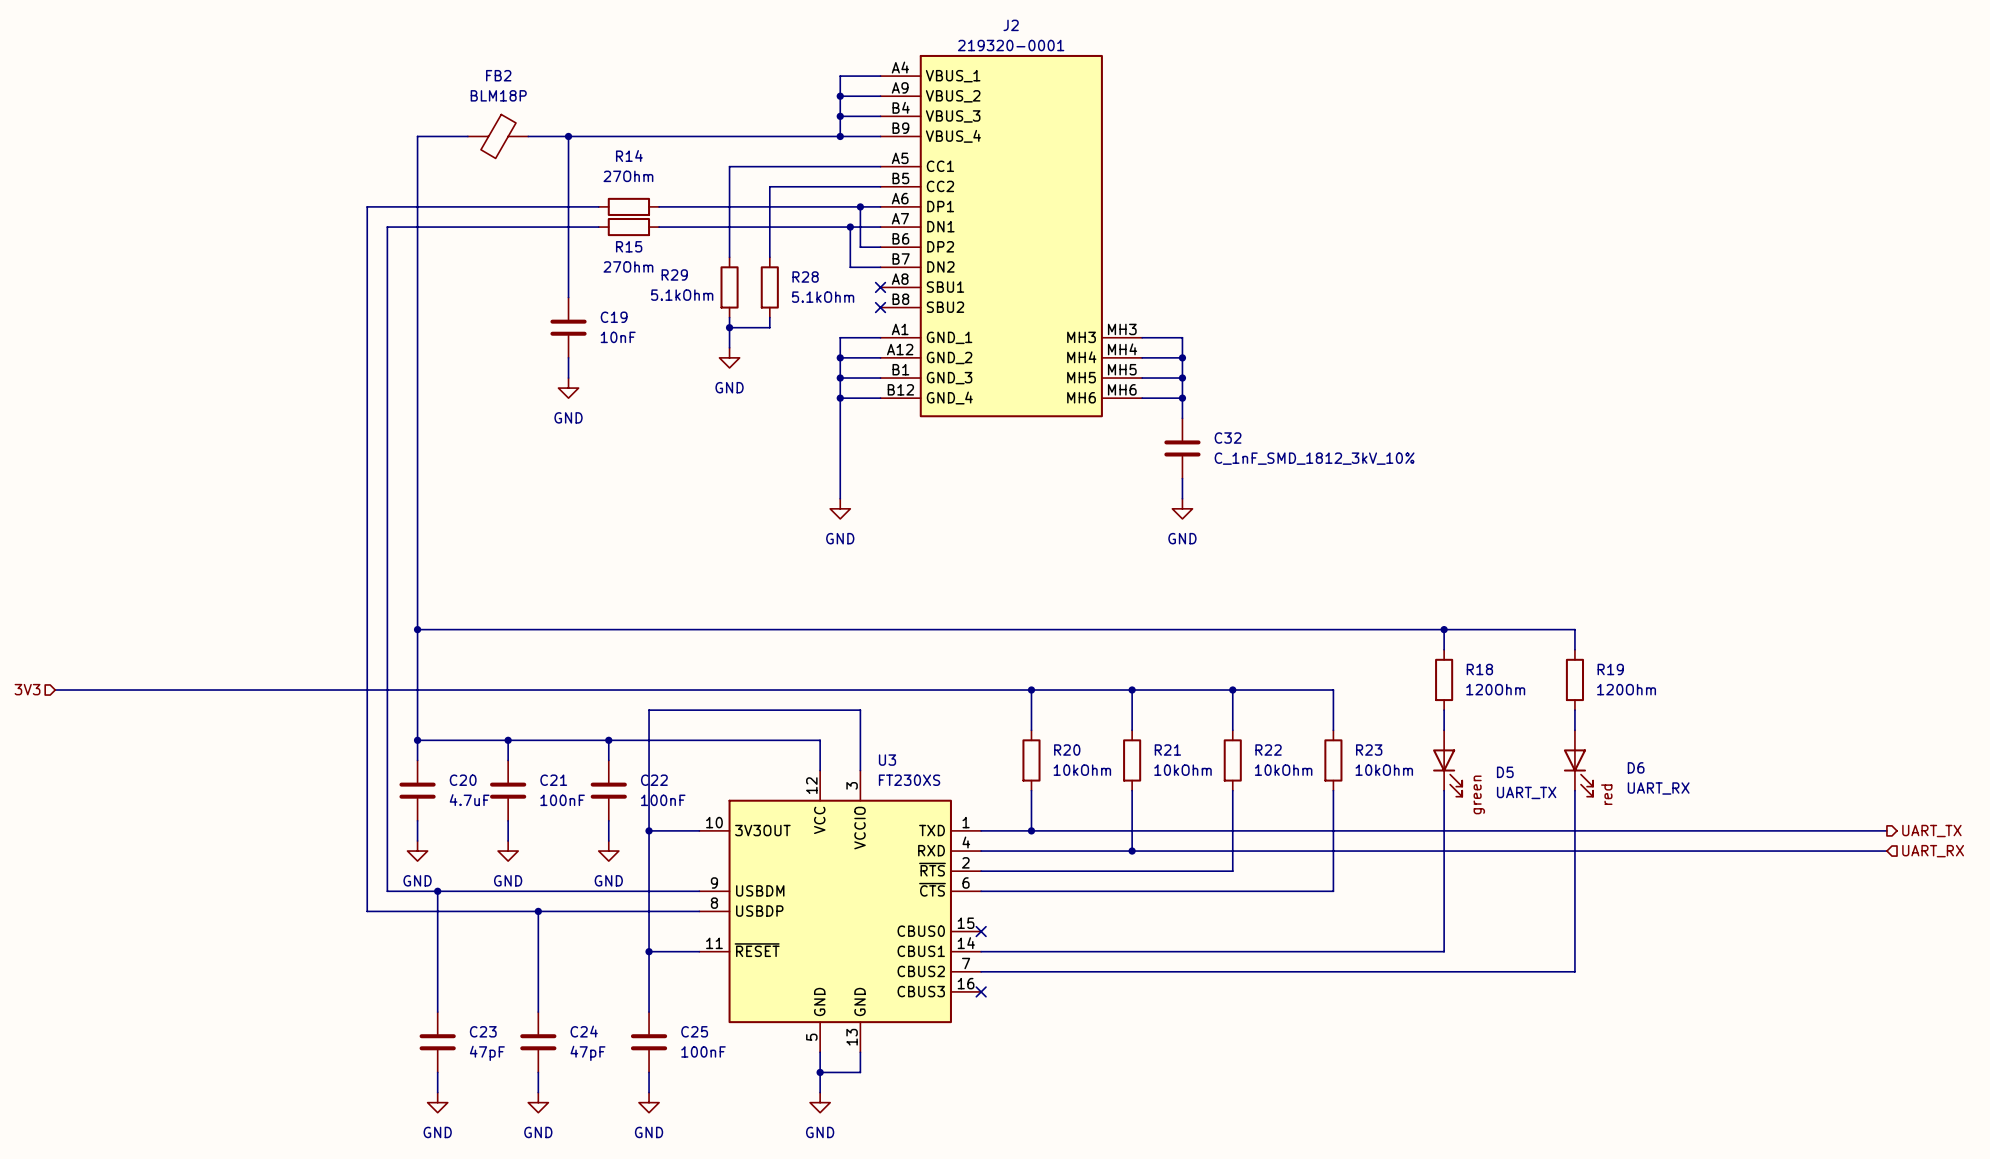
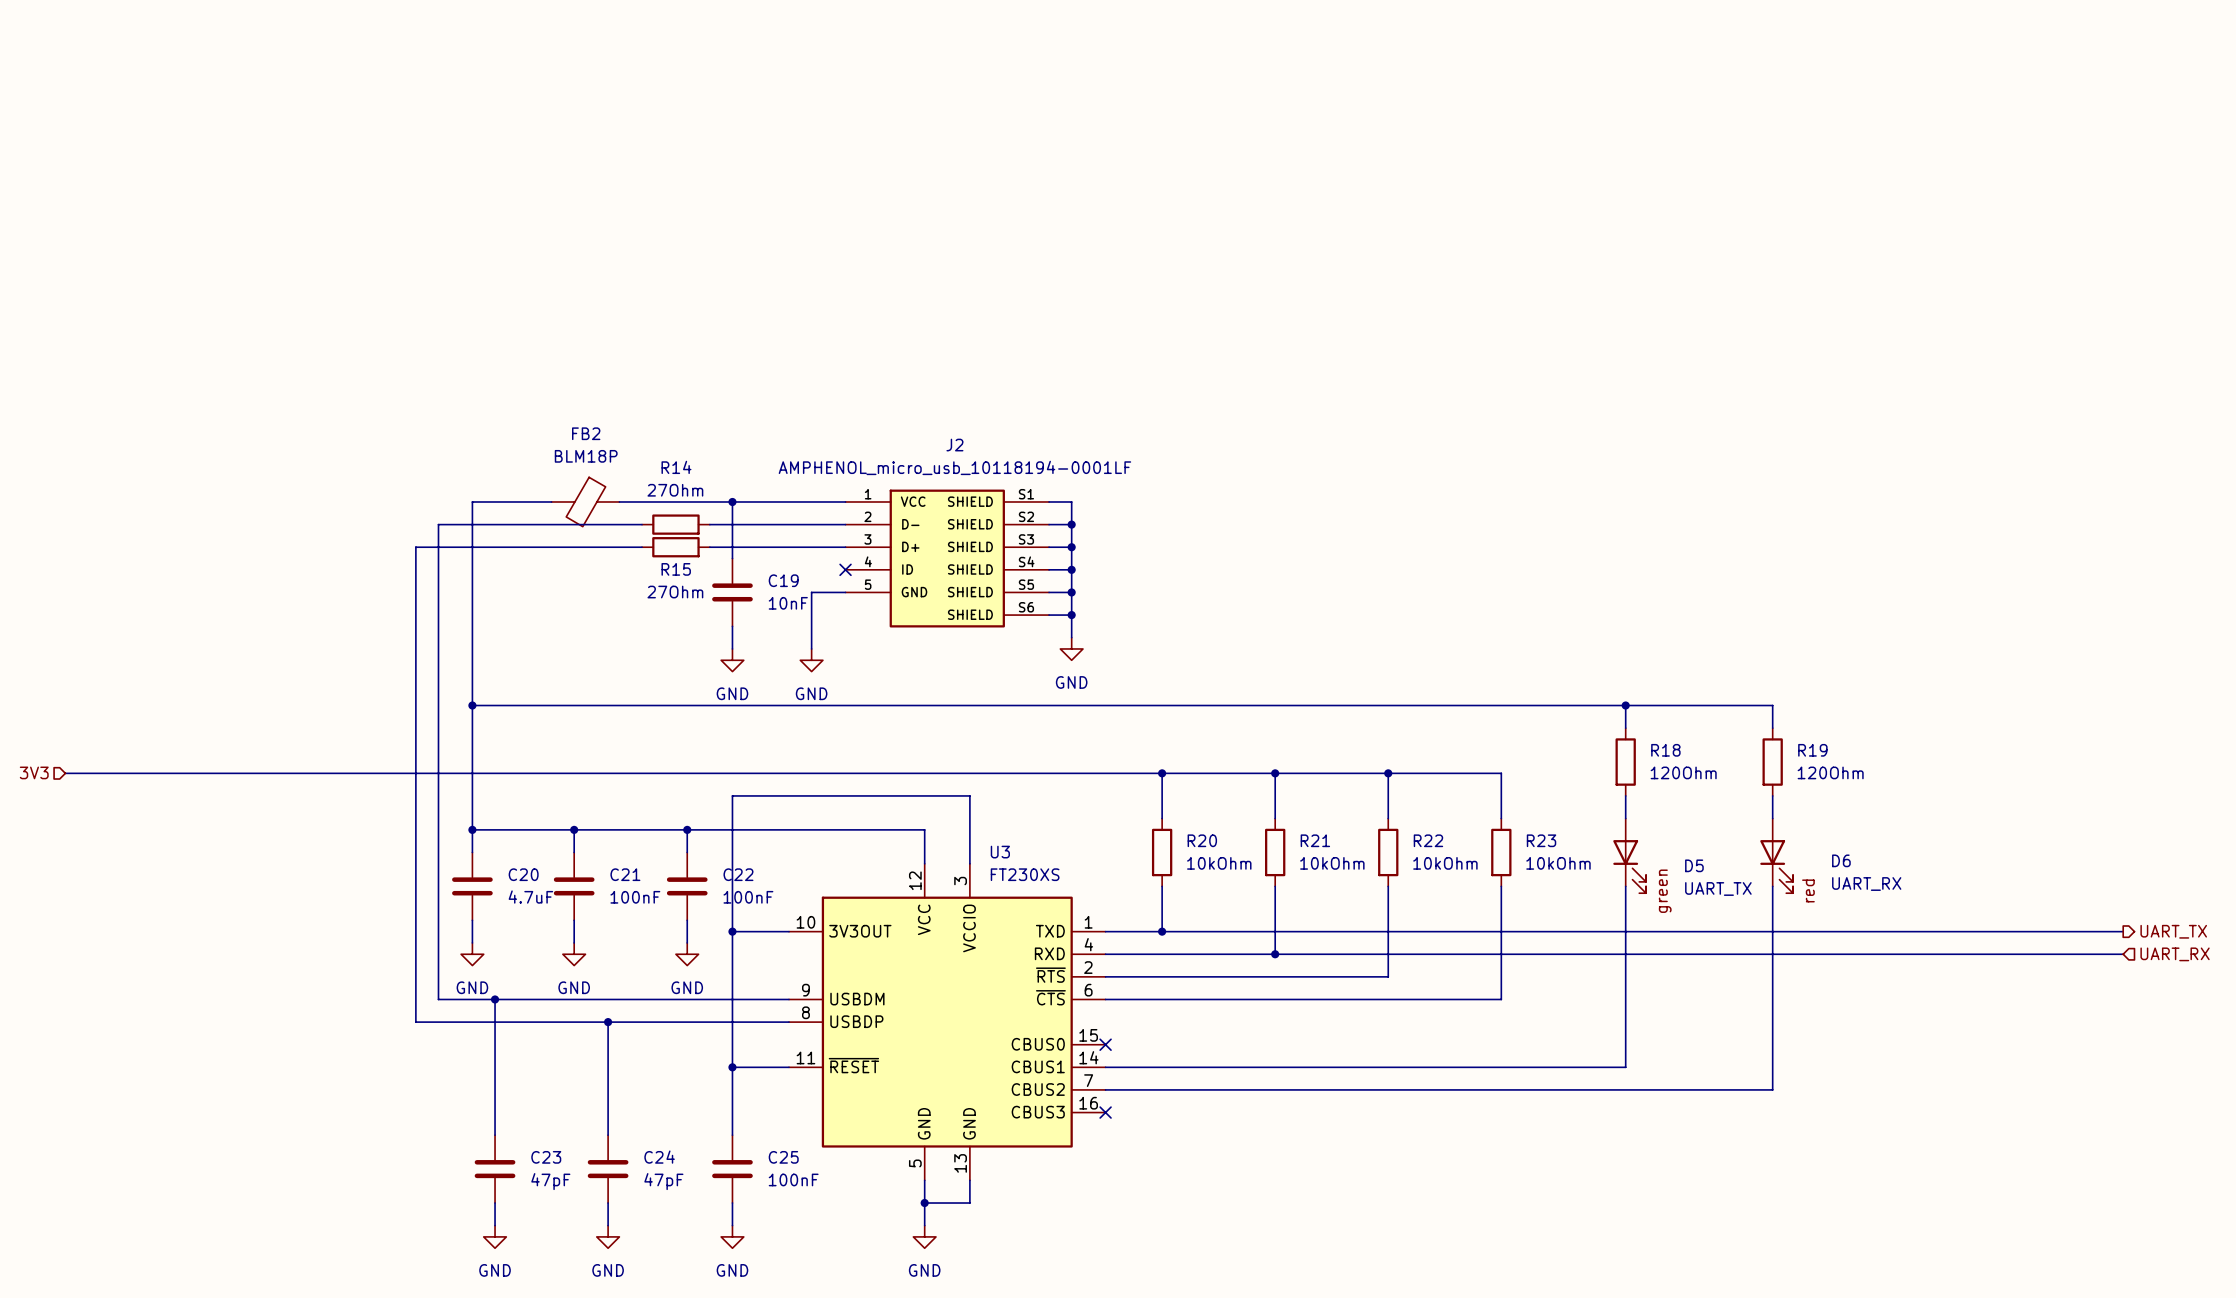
J2 name position: J2 (1011, 25) -> J2 (954, 445)
J2 value: 219320-0001 (1011, 45) -> AMPHENOL_micro_usb_10118194-0001LF (954, 467)
J2 symbol: [880, 54, 1143, 418] -> [845, 489, 1050, 628]
wire: (880, 76) (840, 76) (840, 136) -> none
wire: (840, 96) (880, 96) -> none
junction: (840, 96) -> none
wire: (840, 116) (880, 116) -> none
junction: (840, 116) -> none
wire: (467, 136) (417, 136) (417, 448) -> (551, 501) (472, 501)
FB2 position: (498, 136) -> (585, 501)
wire: (528, 136) (880, 136) -> none
wire: (568, 136) (568, 297) -> none
junction: (568, 136) -> none
junction: (840, 136) -> none
wire: (880, 166) (729, 166) (729, 257) -> none
wire: (880, 186) (769, 186) (769, 257) -> none
wire: (598, 206) (367, 206) (367, 488) -> (642, 547) (415, 547)
R14 position: (628, 206) -> (675, 524)
wire: (659, 206) (880, 206) -> none
wire: (860, 206) (860, 247) (880, 247) -> none
junction: (860, 206) -> none
wire: (598, 227) (387, 227) (387, 468) -> (642, 524) (438, 524)
R15 position: (628, 227) -> (675, 547)
wire: (659, 227) (880, 227) -> none
wire: (850, 227) (850, 267) (880, 267) -> none
junction: (850, 227) -> none
R29: 5.1kOhm (729, 287) -> none
R28: 5.1kOhm (769, 287) -> none
no-connect mark: (880, 287) -> none
no-connect mark: (880, 307) -> none
wire: (729, 317) (729, 347) -> none
wire: (769, 317) (769, 327) (729, 327) -> none
C19 position: (568, 327) -> (732, 592)
junction: (729, 327) -> none
wire: (880, 337) (840, 337) (840, 498) -> none
wire: (1142, 337) (1182, 337) (1182, 418) -> none
wire: (568, 357) (568, 378) -> none
power symbol: GND (729, 357) -> none
wire: (840, 357) (880, 357) -> none
junction: (840, 357) -> none
wire: (1142, 357) (1182, 357) -> none
junction: (1182, 357) -> none
wire: (840, 378) (880, 378) -> none
junction: (840, 378) -> none
wire: (1142, 378) (1182, 378) -> none
junction: (1182, 378) -> none
power symbol: GND (568, 388) -> none
wire: (840, 398) (880, 398) -> none
junction: (840, 398) -> none
wire: (1142, 398) (1182, 398) -> none
junction: (1182, 398) -> none
wire: none -> (619, 501) (845, 501)
wire: none -> (732, 501) (732, 558)
junction: none -> (732, 501)
wire: none -> (1049, 501) (1071, 501) (1071, 637)
C32: C_1nF_SMD_1812_3kV_10% (1182, 448) -> none
wire: none -> (709, 524) (845, 524)
wire: none -> (1049, 524) (1071, 524)
junction: none -> (1071, 524)
wire: (1182, 478) (1182, 498) -> none
wire: none -> (709, 547) (845, 547)
wire: none -> (1049, 547) (1071, 547)
junction: none -> (1071, 547)
no-connect mark: none -> (845, 569)
power symbol: GND (840, 508) -> none
wire: none -> (1049, 569) (1071, 569)
junction: none -> (1071, 569)
power symbol: GND (1182, 508) -> none
wire: none -> (845, 592) (811, 592) (811, 648)
wire: none -> (1049, 592) (1071, 592)
junction: none -> (1071, 592)
wire: none -> (1049, 615) (1071, 615)
junction: none -> (1071, 615)
wire: none -> (732, 626) (732, 648)
power symbol: none -> GND (1071, 648)
power symbol: none -> GND (732, 660)
power symbol: none -> GND (811, 660)

